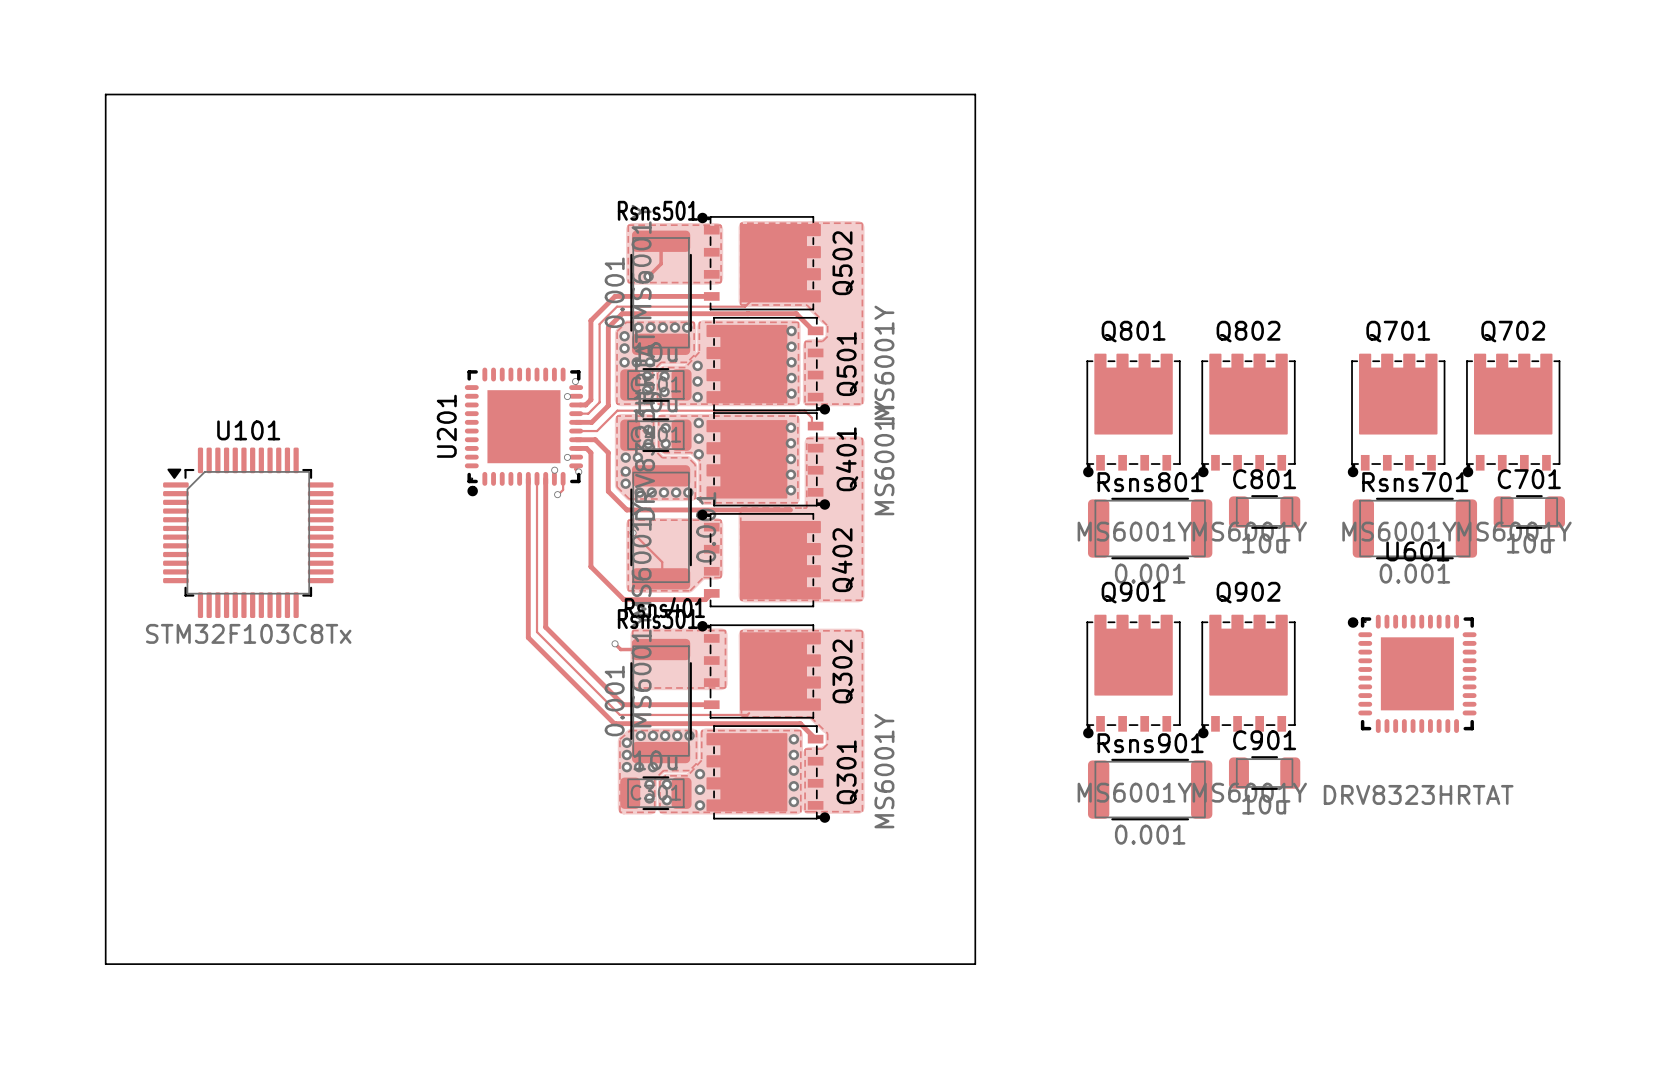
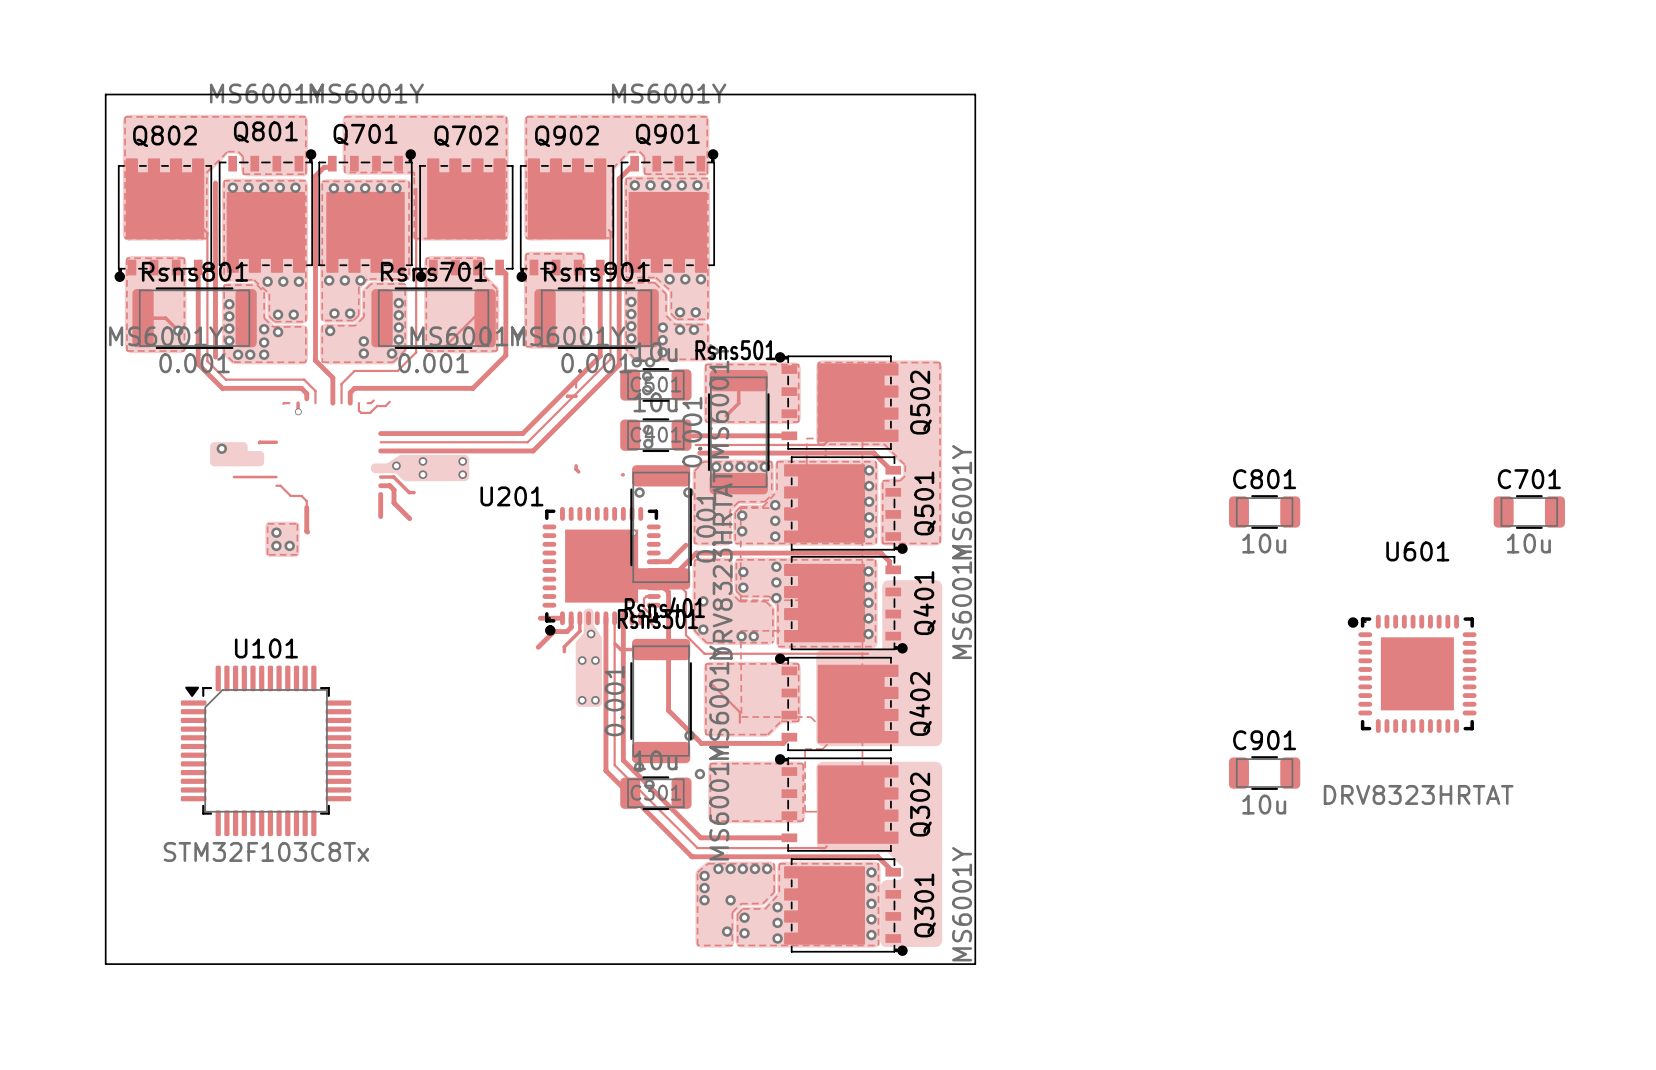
zone outline: none -> (305, 116) (305, 174) (243, 174) (243, 156) (238, 151) (227, 151) (206, 172) (206, 238) (125, 238) (125, 116) (305, 116)
zone outline: none -> (344, 116) (344, 172) (414, 172) (414, 238) (506, 238) (506, 116) (344, 116)
zone outline: none -> (707, 116) (707, 174) (644, 174) (644, 156) (639, 151) (628, 151) (612, 168) (612, 237) (526, 238) (526, 116) (707, 116)
track: none -> (634, 163) (619, 178) (619, 364) (533, 450) (380, 450)
track: none -> (332, 167) (324, 167) (315, 175) (315, 360) (332, 377) (332, 403)
zone outline: none -> (626, 178) (707, 178) (707, 319) (676, 319) (671, 314) (671, 291) (655, 277) (626, 277) (626, 178)
zone outline: none -> (224, 180) (305, 180) (305, 321) (274, 321) (269, 316) (269, 293) (253, 279) (224, 279) (224, 180)
zone outline: none -> (322, 181) (322, 320) (353, 320) (358, 315) (358, 287) (367, 278) (409, 278) (409, 181) (322, 181)
track: none -> (215, 183) (215, 357)
via: none -> (634, 185)
via: none -> (650, 185)
via: none -> (666, 185)
via: none -> (681, 185)
via: none -> (697, 185)
via: none -> (232, 187)
via: none -> (248, 187)
via: none -> (264, 187)
via: none -> (279, 187)
via: none -> (295, 187)
via: none -> (333, 188)
via: none -> (349, 188)
via: none -> (365, 188)
via: none -> (380, 188)
via: none -> (396, 188)
track: none -> (416, 188) (416, 352) (397, 370) (354, 370) (341, 384) (341, 403)
track: none -> (165, 204) (178, 204) (207, 233) (207, 361) (225, 379) (304, 379) (315, 390) (315, 403)
zone outline: (740, 223) (740, 304) (806, 305) (827, 325) (827, 336) (822, 341) (805, 341) (805, 404) (862, 404) (862, 223) (740, 223) -> (818, 362) (818, 444) (884, 444) (905, 465) (905, 475) (900, 480) (882, 480) (882, 543) (940, 543) (939, 362) (818, 362)
zone outline: (628, 225) (628, 282) (721, 282) (721, 225) (628, 225) -> (705, 364) (705, 421) (798, 421) (798, 364) (705, 364)
track: none -> (608, 230) (610, 231) (610, 359) (527, 442) (380, 442)
track: (661, 241) (661, 263) (648, 276) -> (738, 380) (738, 403) (726, 415)
zone outline: none -> (526, 253) (583, 253) (583, 346) (526, 346) (526, 253)
zone outline: none -> (126, 258) (184, 258) (184, 350) (126, 350) (126, 258)
zone outline: none -> (426, 258) (426, 350) (497, 350) (497, 289) (483, 275) (483, 258) (426, 258)
Q502 position: (759, 261) -> (836, 400)
track: none -> (600, 263) (600, 356) (522, 433) (380, 433)
track: (774, 263) (774, 276) (745, 306) (617, 306) (599, 324) (599, 402) (588, 413) (576, 413) -> none
track: none -> (198, 266) (198, 364) (222, 388) (301, 388) (306, 393) (306, 398)
track: none -> (499, 267) (505, 273) (505, 355) (472, 388) (354, 388) (350, 392) (350, 403)
via: (648, 276) -> none
via: none -> (669, 279)
via: none -> (685, 279)
via: none -> (700, 279)
via: none -> (329, 280)
via: none -> (344, 280)
via: none -> (360, 280)
via: none -> (267, 281)
via: none -> (283, 281)
via: none -> (298, 281)
zone outline: none -> (654, 282) (665, 293) (666, 315) (674, 324) (707, 324) (707, 359) (634, 359) (626, 348) (626, 282) (654, 282)
zone outline: none -> (370, 283) (364, 290) (364, 317) (355, 325) (322, 325) (322, 362) (393, 362) (405, 350) (405, 283) (370, 283)
zone outline: none -> (224, 285) (224, 353) (233, 362) (305, 362) (305, 326) (272, 326) (264, 318) (264, 292) (257, 285) (224, 285)
Rsns501 position: (661, 292) -> (738, 432)
track: (713, 296) (615, 296) (590, 320) (590, 399) (585, 404) (580, 404) -> none
via: none -> (631, 301)
via: none -> (398, 303)
via: none -> (229, 304)
via: none -> (680, 312)
via: none -> (695, 312)
via: none -> (334, 313)
via: none -> (350, 313)
via: none -> (278, 314)
via: none -> (293, 314)
via: none -> (631, 314)
via: none -> (398, 315)
via: none -> (229, 316)
track: none -> (485, 317) (474, 317) (445, 346)
track: none -> (143, 318) (165, 318) (178, 330)
zone outline: (626, 322) (617, 331) (616, 404) (652, 404) (652, 371) (661, 362) (687, 362) (694, 355) (694, 322) (626, 322) -> none
zone outline: (699, 322) (699, 352) (685, 367) (662, 367) (657, 372) (657, 404) (798, 404) (798, 322) (699, 322) -> (776, 461) (776, 491) (763, 506) (740, 506) (735, 512) (735, 543) (876, 543) (876, 461) (776, 461)
via: none -> (631, 326)
via: none -> (398, 327)
via: (638, 327) -> none
via: (650, 327) -> none
via: (675, 327) -> none
via: (687, 327) -> none
via: none -> (229, 328)
via: none -> (264, 329)
via: none -> (680, 329)
via: none -> (693, 329)
via: none -> (178, 330)
via: none -> (330, 330)
track: (813, 330) (796, 313) (622, 313) (608, 327) (608, 405) (591, 422) (576, 422) -> none
via: (791, 331) -> none
via: none -> (278, 332)
via: (624, 336) -> none
via: none -> (631, 338)
via: none -> (398, 339)
via: none -> (229, 340)
via: none -> (662, 340)
via: none -> (363, 341)
via: none -> (264, 342)
via: (791, 346) -> none
via: (624, 348) -> none
via: none -> (662, 352)
via: none -> (363, 353)
via: none -> (392, 353)
via: none -> (238, 354)
via: none -> (250, 354)
via: none -> (264, 354)
via: (624, 362) -> none
via: (791, 362) -> none
via: (697, 365) -> none
Q501 position: (768, 365) -> (845, 505)
via: (664, 376) -> none
via: (791, 378) -> none
via: (575, 381) -> none
via: (697, 381) -> none
via: (664, 391) -> none
via: (791, 393) -> none
via: (567, 396) -> none
via: (697, 397) -> none
track: none -> (373, 400) (367, 403)
track: none -> (389, 401) (385, 406) (377, 406) (370, 412) (361, 412) (358, 410) (358, 403)
track: none -> (852, 402) (852, 416) (823, 444) (695, 444)
track: none -> (289, 403) (283, 403)
track: none -> (298, 403) (298, 411)
via: none -> (298, 411)
Q801 rotation: 0° (1131, 415) -> 180° (267, 211)
Q801 position: (1131, 415) -> (267, 211)
Q802 position: (1246, 415) -> (163, 220)
Q701 rotation: 0° (1396, 415) -> 180° (367, 211)
Q701 position: (1396, 415) -> (367, 211)
Q702 position: (1511, 415) -> (464, 220)
zone outline: (617, 416) (653, 416) (653, 449) (662, 457) (688, 457) (695, 464) (695, 498) (629, 499) (617, 486) (617, 416) -> (694, 559) (731, 559) (731, 592) (739, 601) (765, 601) (772, 608) (772, 642) (706, 642) (694, 630) (694, 559)
zone outline: (658, 416) (658, 447) (663, 452) (691, 452) (700, 461) (700, 502) (797, 502) (797, 416) (658, 416) -> (736, 559) (736, 591) (741, 596) (769, 596) (777, 604) (778, 646) (875, 646) (875, 559) (736, 559)
via: (698, 423) -> none
U201 name rotation: 0° (446, 426) -> 90° clockwise (511, 496)
track: (811, 426) (811, 417) (804, 410) (617, 410) (597, 431) (576, 431) -> none
via: (790, 427) -> none
via: (665, 428) -> none
U201 position: (523, 431) -> (601, 571)
track: none -> (692, 435) (790, 435)
via: (698, 438) -> none
track: (576, 439) (595, 439) (608, 452) (608, 491) (626, 509) (790, 509) -> none
track: none -> (276, 442) (259, 442)
via: (665, 443) -> none
via: (790, 443) -> none
via: none -> (221, 448)
track: (576, 448) (586, 448) (590, 452) (590, 566) (623, 599) (705, 599) (711, 593) -> none
track: none -> (699, 453) (825, 453)
track: none -> (825, 453) (873, 453) (890, 470)
via: (698, 454) -> none
via: (567, 457) -> none
via: (625, 457) -> none
via: (637, 457) -> none
via: (790, 458) -> none
Q401 position: (768, 460) -> (845, 604)
via: none -> (422, 461)
via: none -> (462, 461)
zone outline: none -> (771, 461) (703, 461) (694, 470) (694, 543) (730, 543) (730, 510) (738, 501) (764, 501) (771, 494) (771, 461)
via: none -> (396, 465)
via: none -> (716, 466)
via: none -> (728, 466)
via: none -> (740, 466)
via: none -> (752, 466)
via: none -> (764, 466)
via: (554, 470) -> none
via: none -> (869, 470)
via: (578, 471) -> none
via: (625, 471) -> none
via: none -> (422, 474)
via: none -> (462, 474)
via: (790, 474) -> none
track: none -> (233, 477) (276, 477)
track: none -> (380, 477) (393, 477) (409, 492) (414, 492)
track: (528, 478) (528, 637) (614, 723) (800, 723) (815, 738) -> none
track: (537, 478) (537, 632) (619, 714) (747, 714) (749, 713) -> none
track: (545, 478) (545, 627) (623, 704) (715, 704) -> none
track: (563, 478) (563, 489) (557, 494) -> none
via: (625, 483) -> none
track: none -> (276, 485) (280, 485) (290, 495) (301, 495) (306, 501) (307, 532)
track: none -> (380, 485) (389, 485) (394, 489) (394, 502) (409, 518)
via: none -> (869, 486)
via: (790, 490) -> none
via: (651, 492) -> none
via: (663, 492) -> none
via: (676, 492) -> none
track: none -> (380, 494) (380, 516)
via: (557, 494) -> none
via: none -> (869, 501)
via: none -> (775, 505)
via: none -> (742, 515)
via: none -> (869, 517)
zone outline: (628, 520) (721, 520) (721, 577) (703, 577) (690, 590) (628, 590) (628, 520) -> (705, 663) (798, 663) (798, 721) (781, 721) (767, 734) (705, 734) (705, 663)
via: none -> (775, 520)
zone outline: none -> (267, 523) (267, 554) (297, 554) (297, 523) (267, 523)
Rsns801 position: (1150, 528) -> (194, 318)
Rsns701 position: (1414, 528) -> (433, 318)
via: none -> (742, 531)
U101 position: (248, 532) -> (266, 750)
via: none -> (276, 532)
track: (633, 532) (662, 562) (662, 578) -> none
via: none -> (869, 533)
via: none -> (775, 536)
via: none -> (276, 545)
via: none -> (289, 545)
track: none -> (685, 545) (669, 561) (653, 561)
Q402 position: (759, 558) -> (836, 702)
via: none -> (776, 566)
track: none -> (889, 569) (889, 561) (880, 553) (696, 553) (679, 570) (653, 570)
via: none -> (868, 571)
via: none -> (743, 572)
track: none -> (653, 579) (672, 579) (685, 592) (685, 635) (704, 653) (868, 653)
via: none -> (776, 582)
track: none -> (653, 587) (664, 587) (668, 592) (668, 710) (701, 743) (783, 743) (789, 737)
via: none -> (743, 587)
via: none -> (868, 587)
track: none -> (653, 596) (646, 596) (643, 598) (643, 607) (650, 614) (650, 623) (655, 627)
via: none -> (776, 598)
via: none -> (703, 601)
via: none -> (868, 602)
track: none -> (540, 618) (562, 618)
track: none -> (571, 618) (571, 627) (566, 631) (553, 631) (538, 647)
track: none -> (579, 618) (579, 631) (564, 646) (564, 651)
track: none -> (605, 618) (605, 770) (691, 856) (877, 856) (893, 872)
track: none -> (614, 618) (614, 765) (697, 848) (825, 848) (826, 846)
track: none -> (623, 618) (623, 760) (700, 837) (793, 837)
via: none -> (868, 618)
via: none -> (703, 629)
zone outline: (632, 630) (725, 630) (725, 687) (632, 687) (632, 630) -> (710, 763) (803, 763) (803, 821) (710, 821) (710, 763)
via: none -> (591, 634)
via: none -> (868, 634)
via: none -> (741, 636)
via: none -> (753, 636)
via: (615, 643) -> none
via: none -> (582, 660)
via: none -> (595, 660)
Q302 position: (759, 669) -> (836, 802)
Q901 rotation: 0° (1131, 676) -> 180° (669, 211)
Q901 position: (1131, 676) -> (669, 211)
Q902 position: (1246, 676) -> (565, 220)
track: none -> (710, 682) (739, 712) (739, 722)
via: none -> (582, 700)
via: none -> (595, 700)
zone outline: (630, 730) (696, 730) (696, 763) (689, 770) (663, 770) (654, 779) (654, 812) (619, 812) (619, 739) (630, 730) -> none
zone outline: (701, 730) (701, 760) (687, 775) (665, 775) (659, 781) (659, 812) (800, 812) (800, 730) (701, 730) -> (779, 863) (779, 893) (765, 908) (742, 908) (737, 914) (737, 945) (878, 945) (878, 863) (779, 863)
via: (640, 735) -> none
via: (652, 735) -> none
via: (665, 735) -> none
via: (677, 735) -> none
via: (793, 739) -> none
via: (626, 742) -> none
via: (626, 754) -> none
via: (793, 754) -> none
via: (626, 767) -> none
via: (652, 767) -> none
via: (793, 770) -> none
Q301 position: (768, 774) -> (845, 907)
via: (666, 784) -> none
via: (793, 786) -> none
via: (699, 789) -> none
Rsns901 position: (1150, 789) -> (596, 318)
via: (649, 798) -> none
via: (666, 800) -> none
via: (793, 801) -> none
via: (699, 805) -> none
zone outline: none -> (708, 863) (697, 872) (697, 945) (732, 945) (732, 912) (741, 903) (762, 903) (774, 892) (774, 863) (708, 863)
via: none -> (718, 868)
via: none -> (730, 868)
via: none -> (742, 868)
via: none -> (754, 868)
via: none -> (767, 868)
via: none -> (871, 872)
via: none -> (704, 875)
via: none -> (704, 888)
via: none -> (871, 888)
via: none -> (704, 900)
via: none -> (730, 900)
via: none -> (871, 903)
via: none -> (777, 907)
via: none -> (744, 917)
via: none -> (871, 919)
via: none -> (777, 922)
via: none -> (727, 931)
via: none -> (744, 933)
via: none -> (871, 935)
via: none -> (777, 938)

